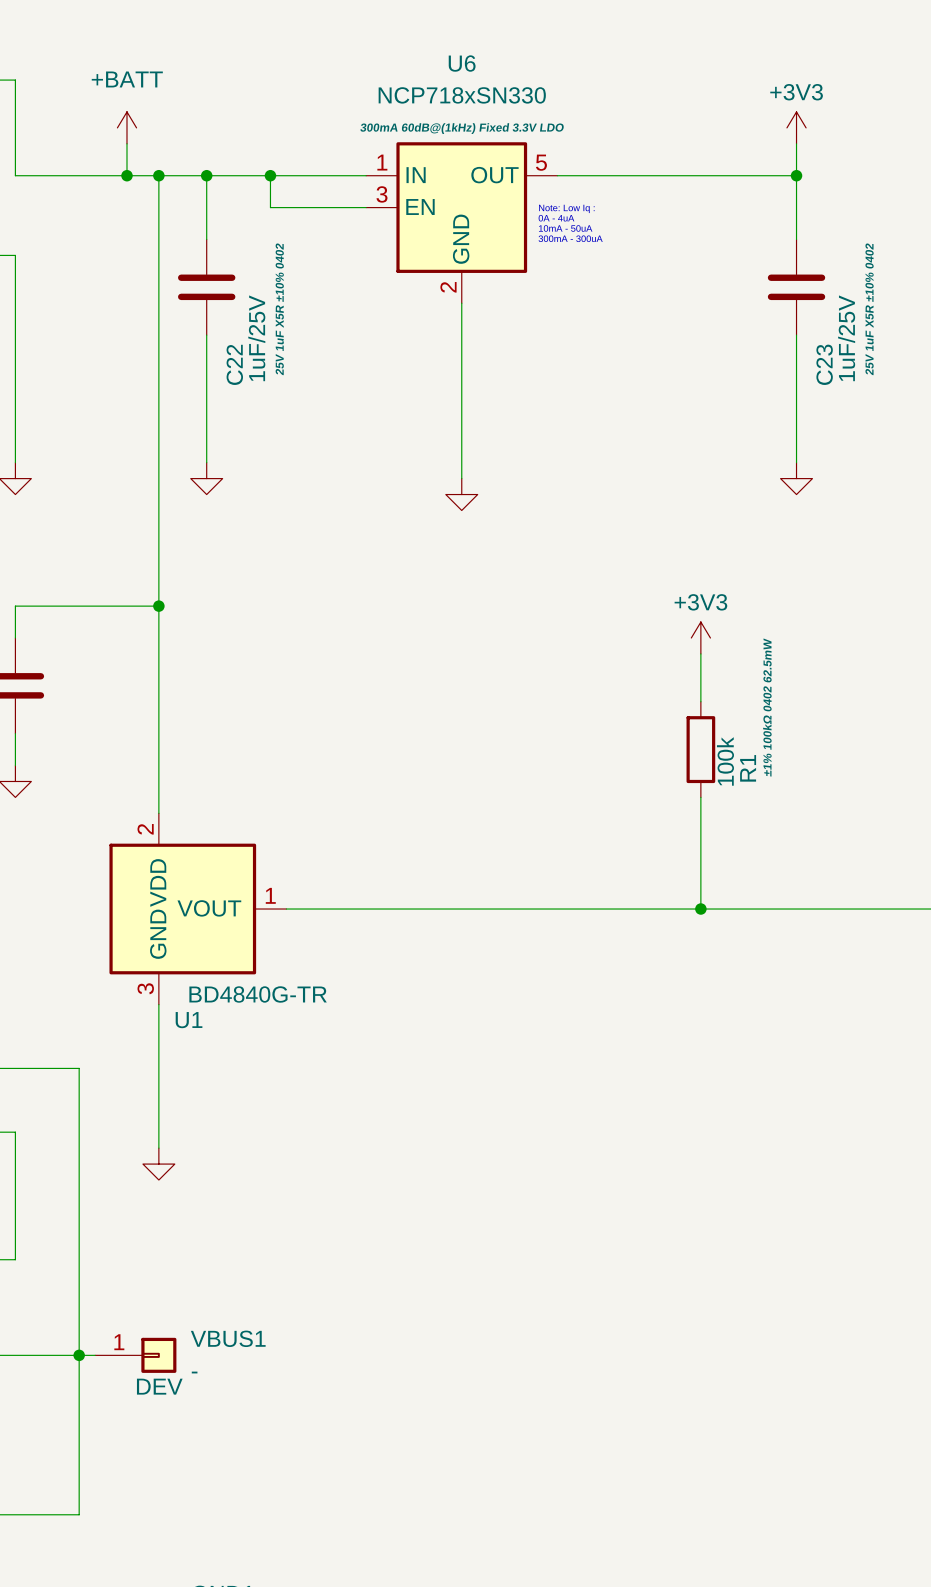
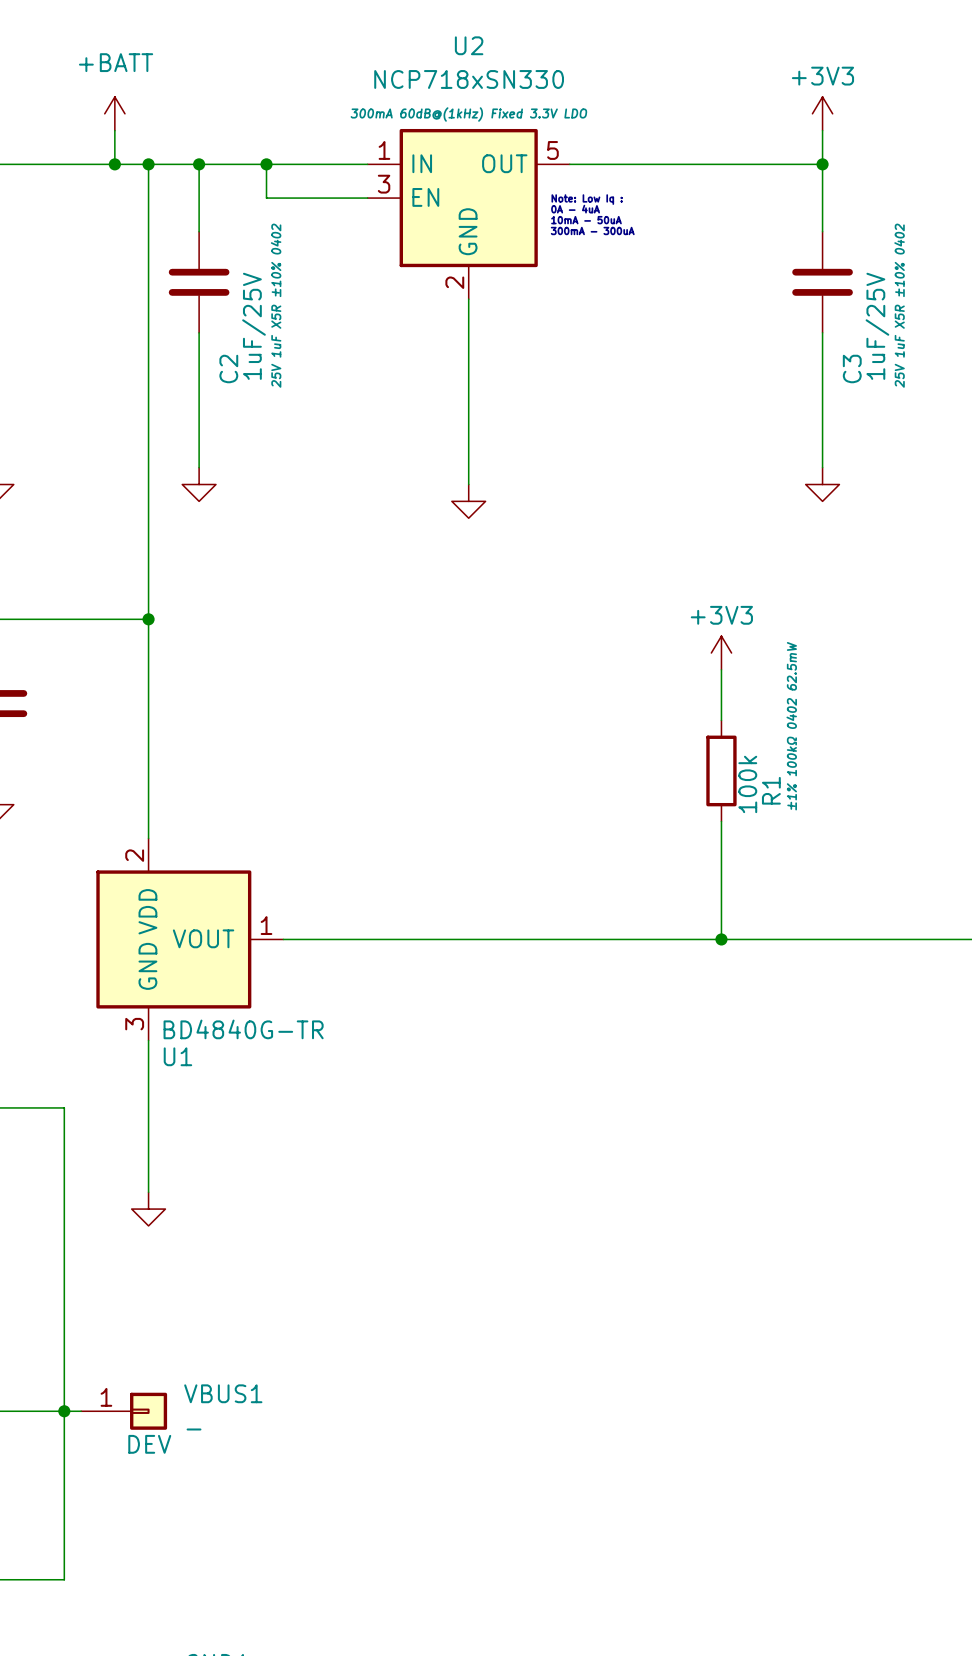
U6 name: U6 (462, 63) -> U2 (469, 45)
C22 name: C22 (234, 364) -> C2 (228, 369)
C23 name: C23 (824, 364) -> C3 (852, 369)

